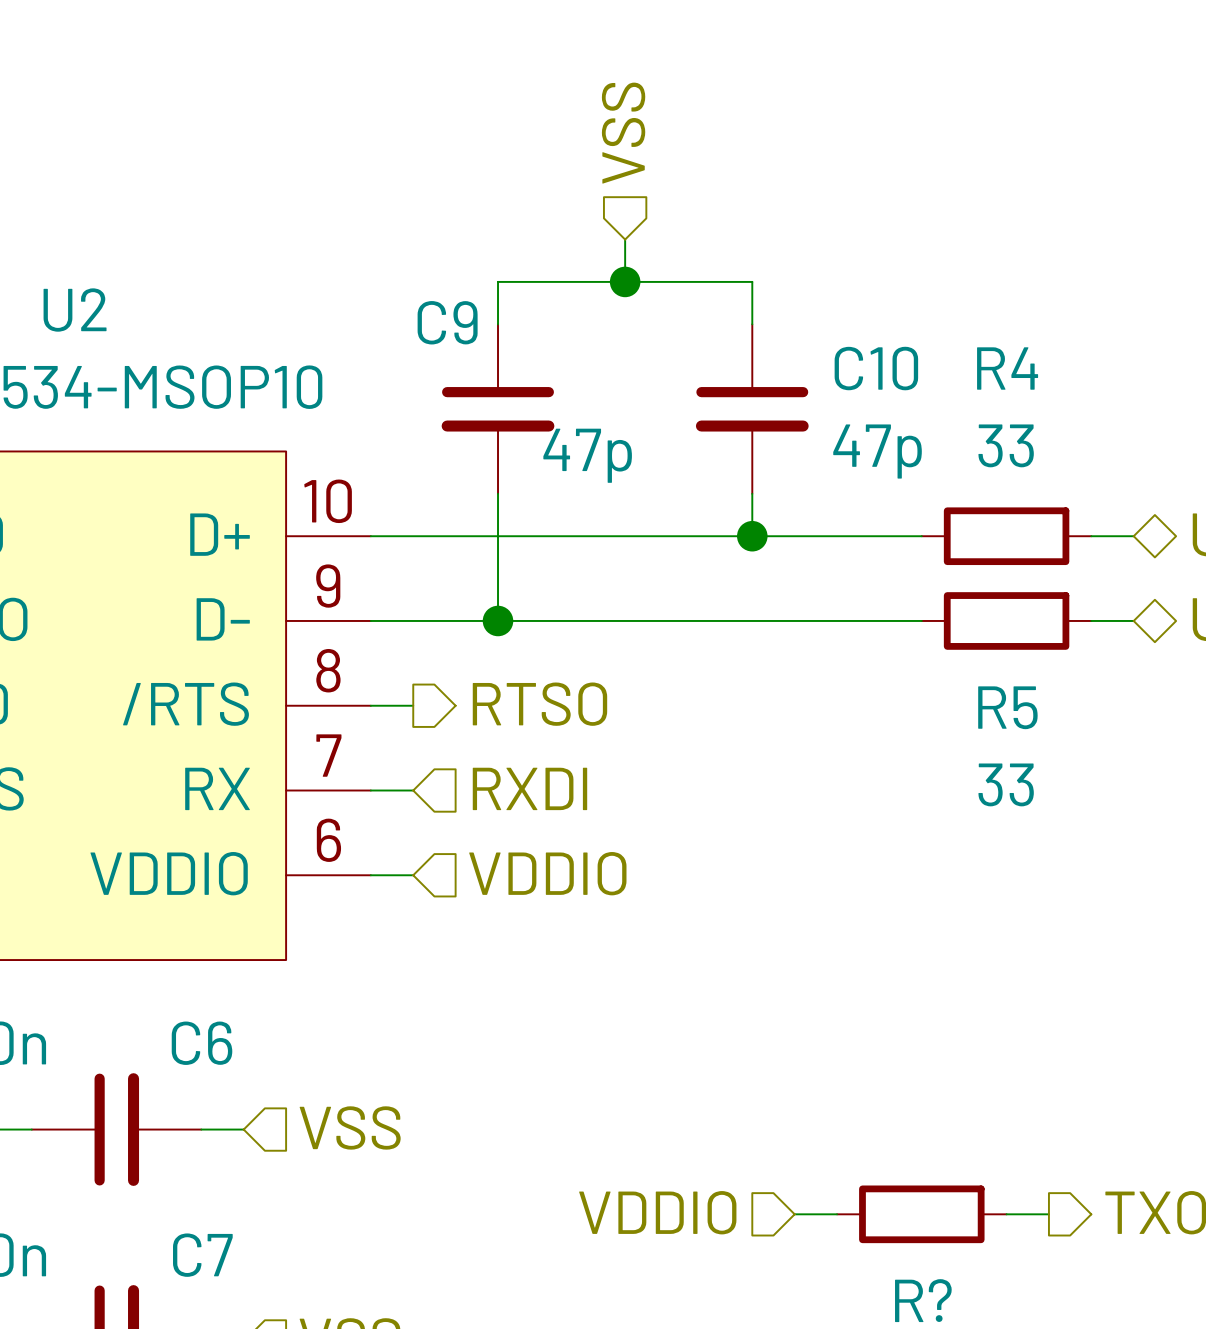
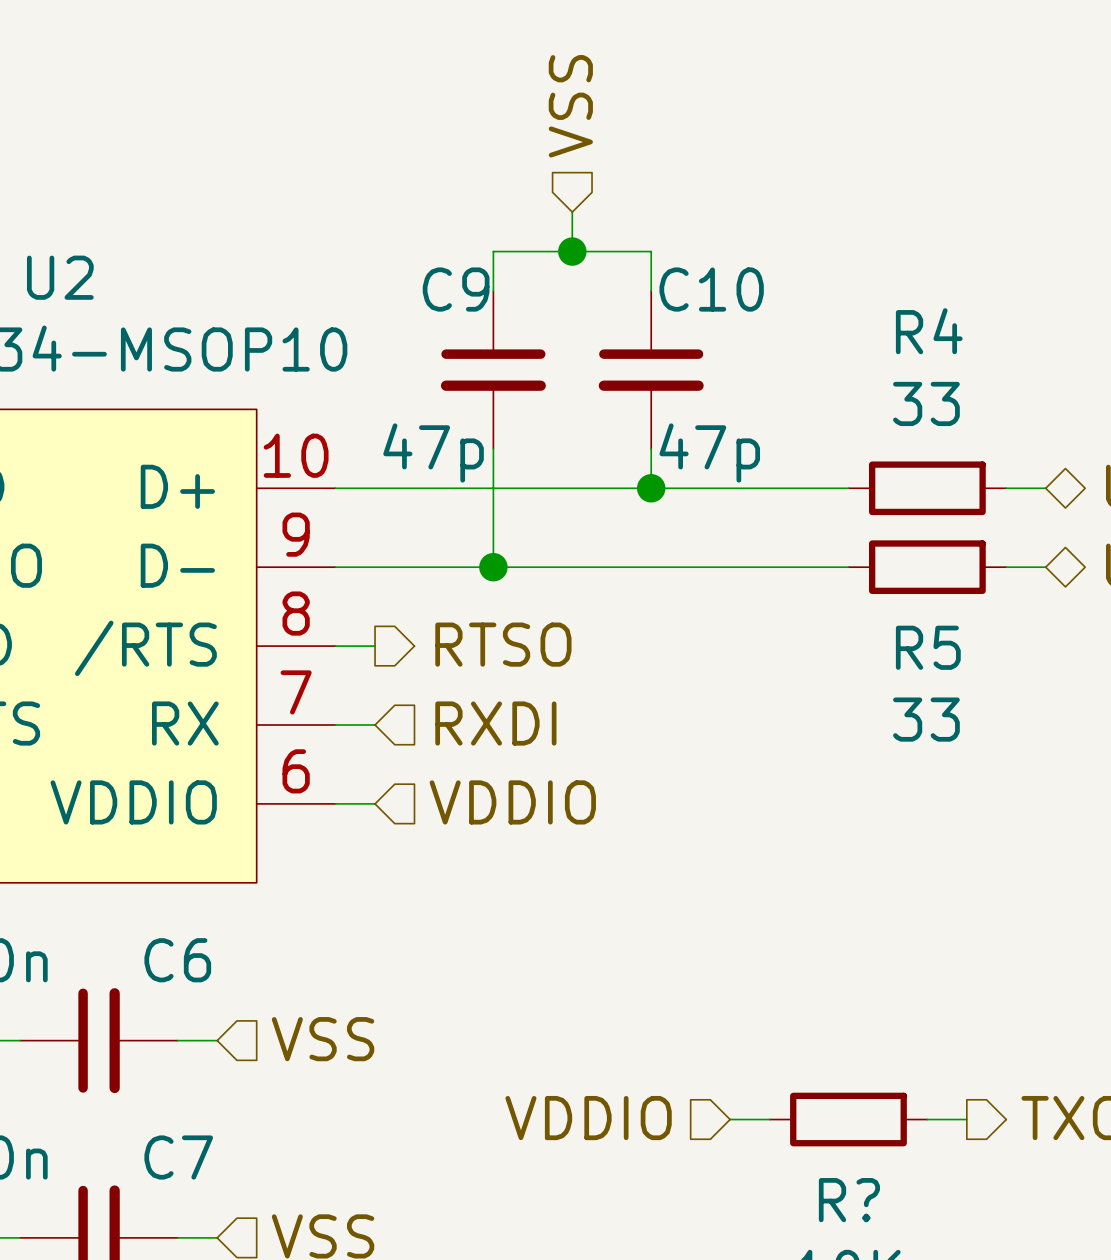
wire: (540, 281) (498, 281) (498, 324) -> (493, 251) (493, 291)
wire: (709, 281) (752, 281) (752, 324) -> (651, 251) (651, 291)
C10 name position: C10 (876, 368) -> C10 (711, 289)
C9 position: (498, 409) -> (493, 369)
C10 position: (752, 409) -> (651, 369)
C10 value position: 47p (877, 451) -> 47p (709, 452)
C9 value position: 47p (587, 455) -> 47p (433, 452)
wire: (498, 493) (498, 620) -> (493, 448) (493, 567)
wire: (752, 493) (752, 536) -> (651, 448) (651, 488)
junction position: (752, 536) -> (651, 488)
junction position: (498, 620) -> (493, 567)

